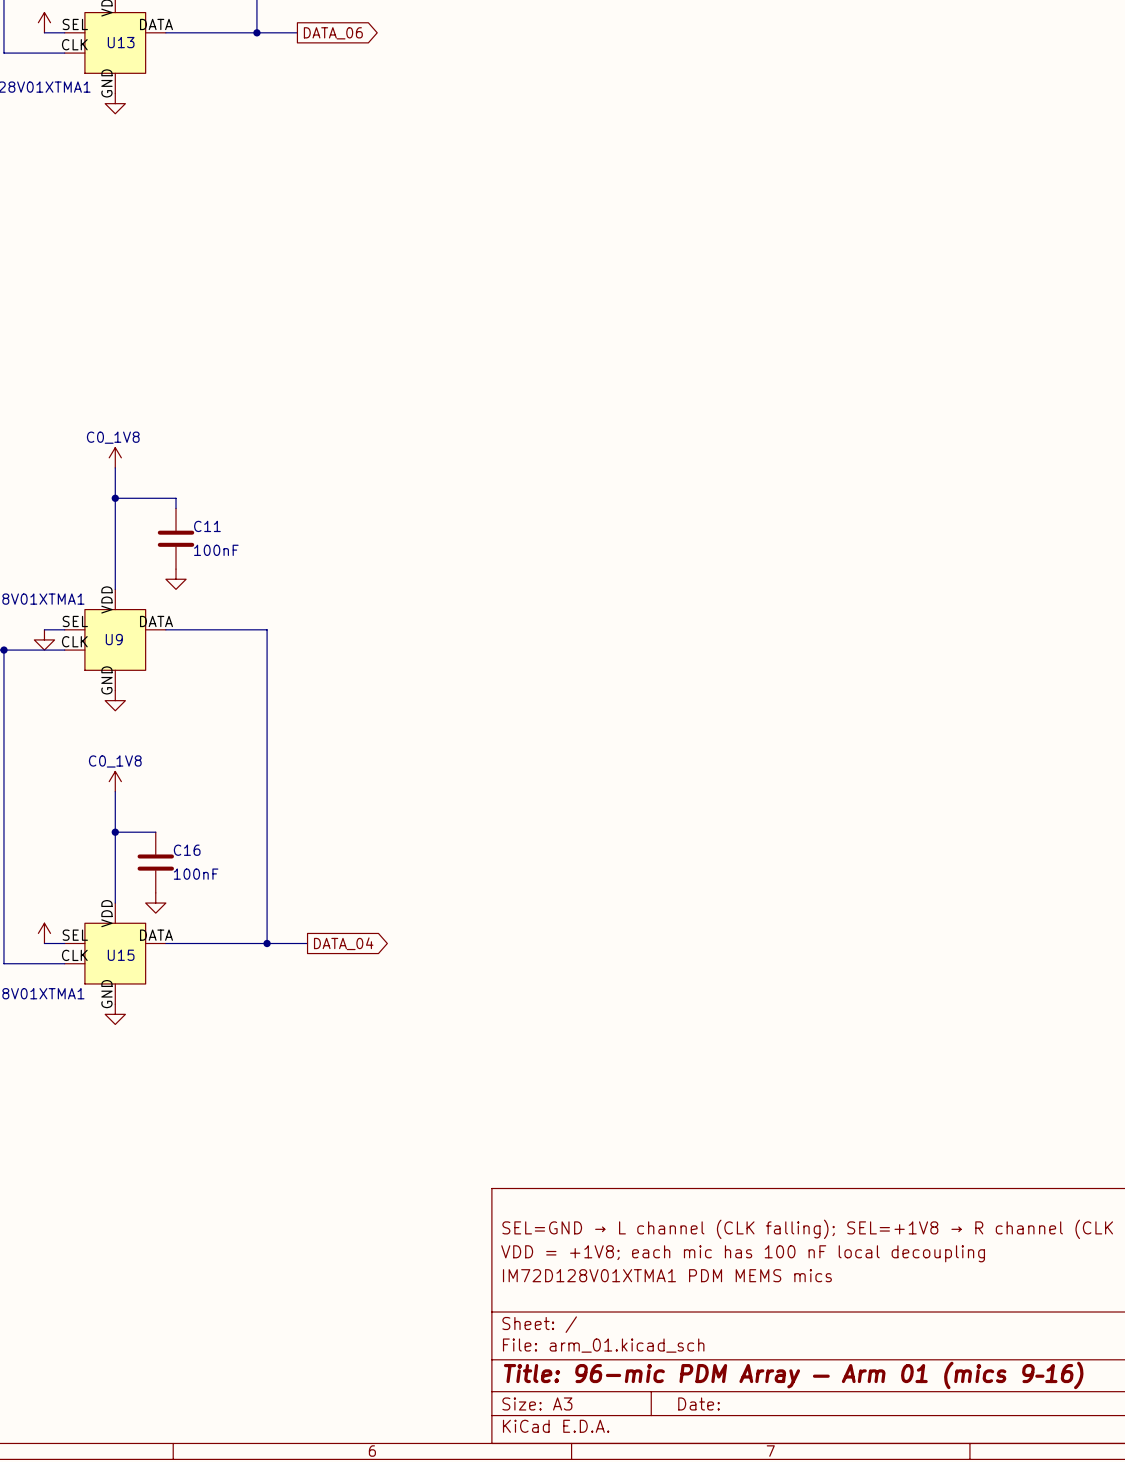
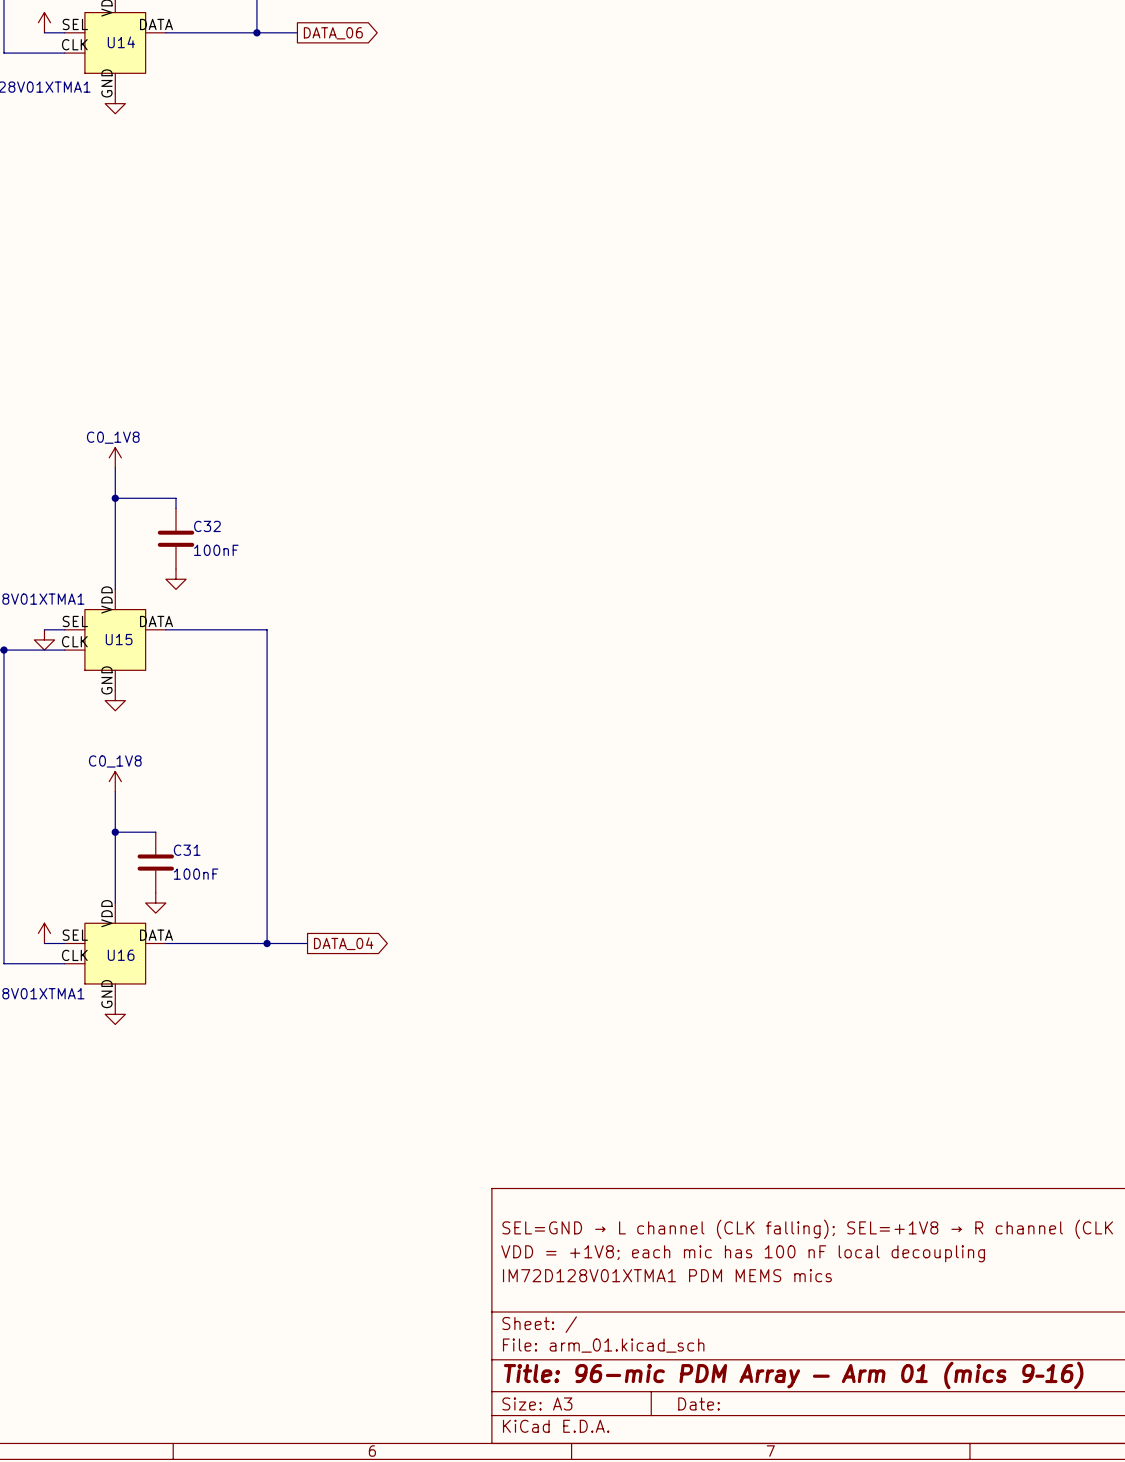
U13 name: U13 (121, 42) -> U14 (121, 42)
C11 name: C11 (207, 526) -> C32 (207, 526)
U9 name: U9 (114, 639) -> U15 (119, 639)
C16 name: C16 (187, 850) -> C31 (187, 850)
U15 name: U15 (121, 955) -> U16 (121, 955)

